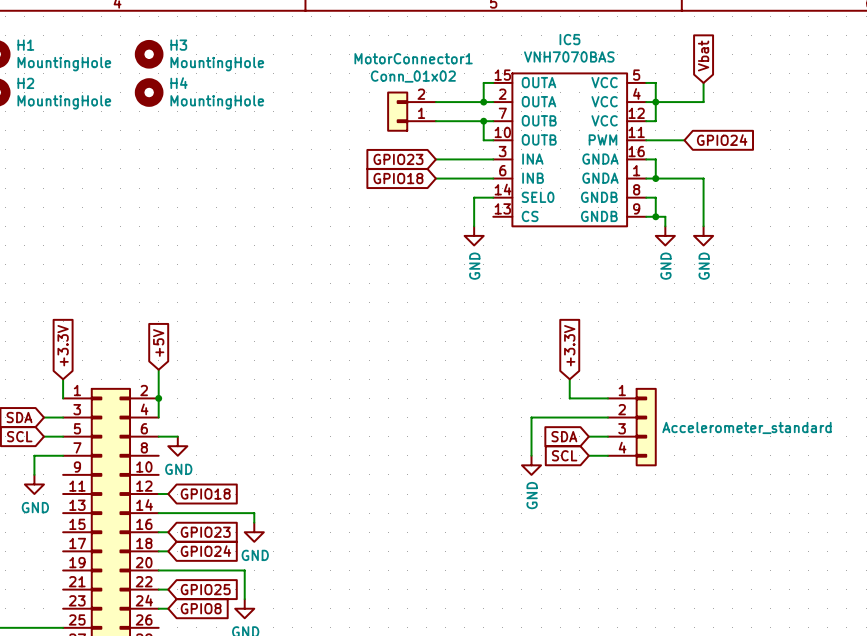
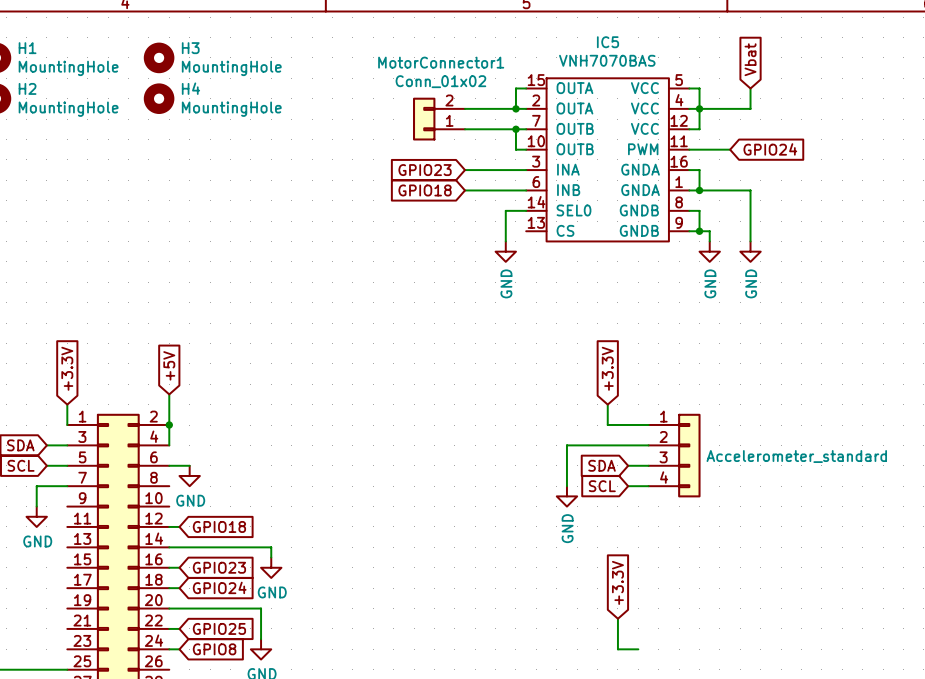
global label: none -> +3.3V (617, 582)
wire: none -> (617, 618) (617, 649) (638, 649)

